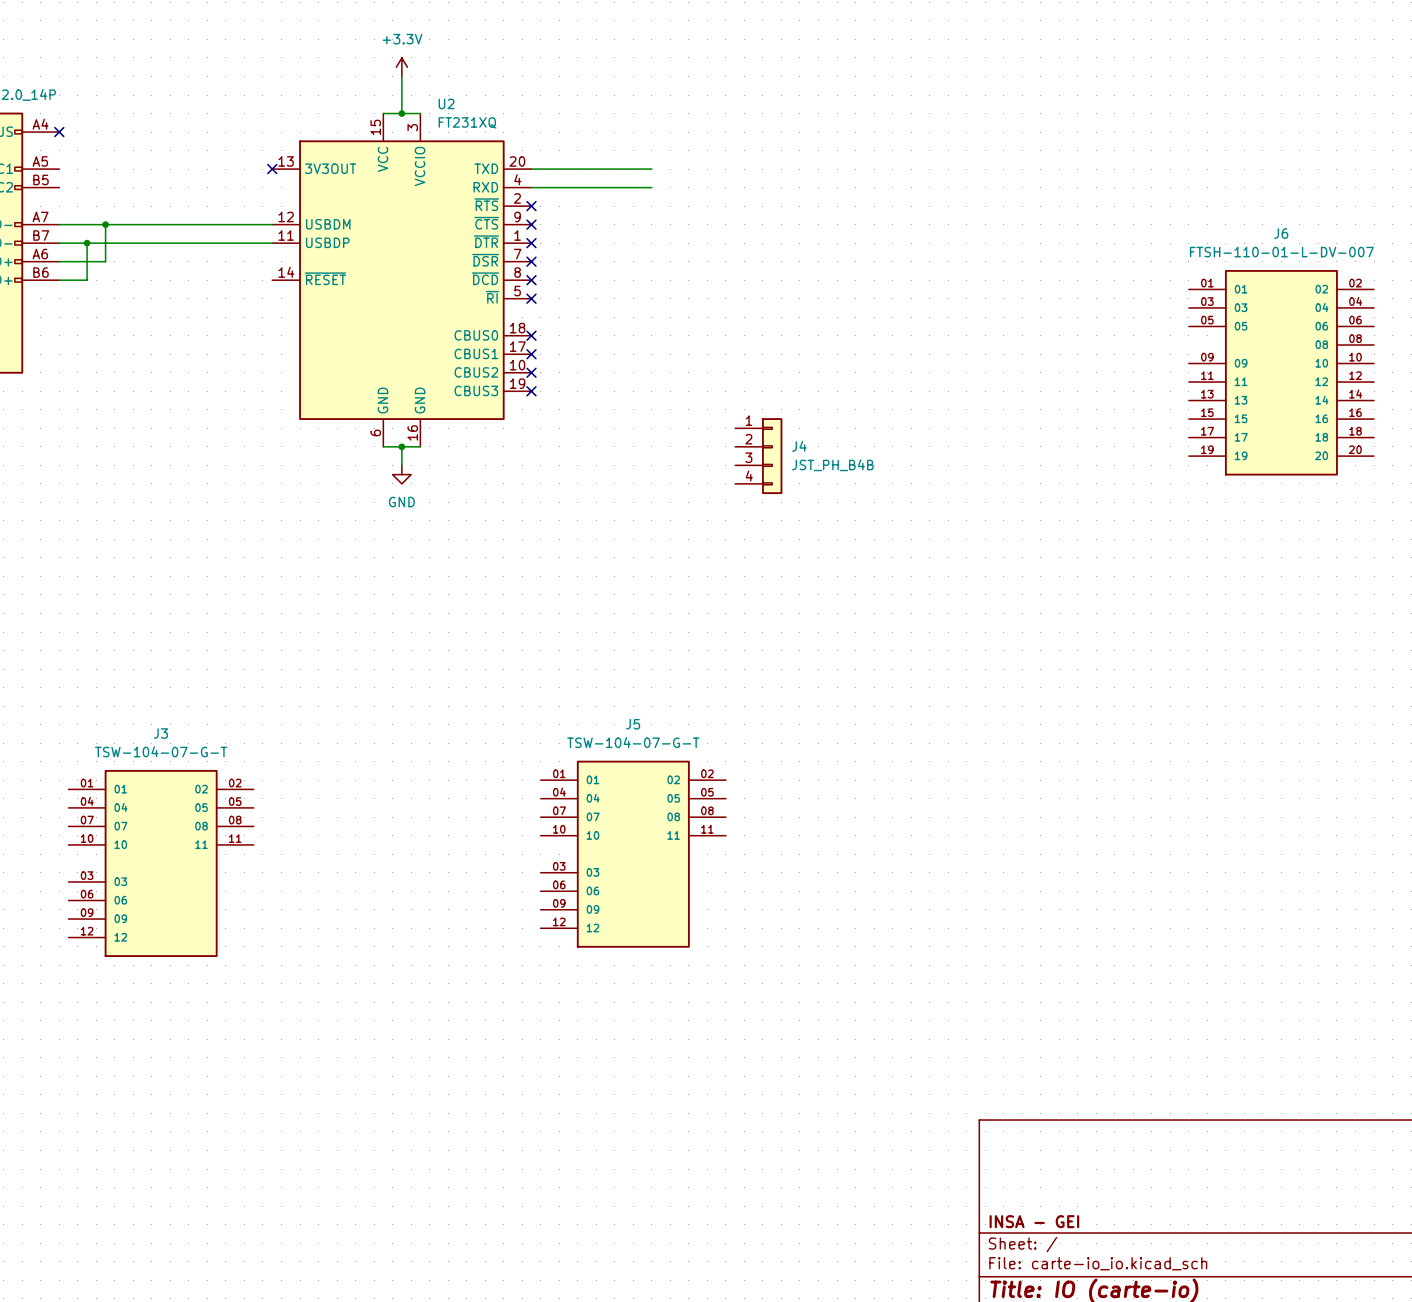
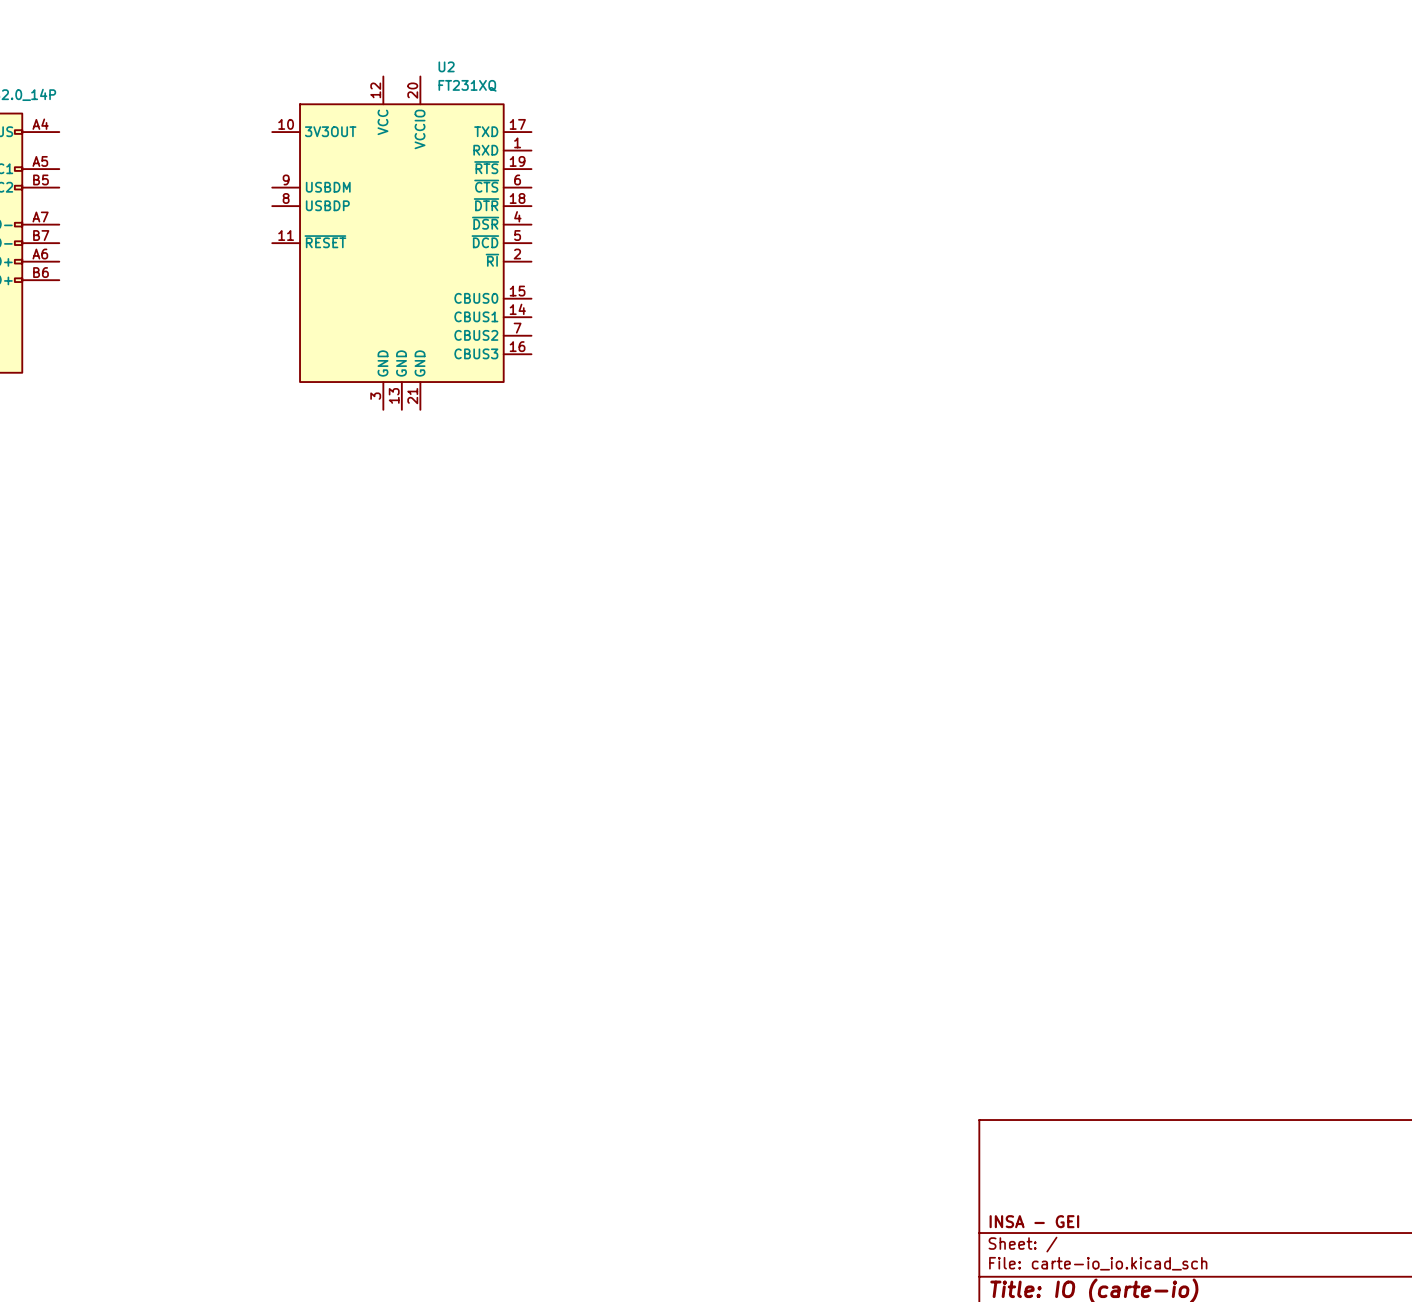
power symbol: +3.3V (401, 67) -> none
wire: (401, 76) (401, 113) -> none
U2 symbol: [272, 113, 532, 447] -> [272, 76, 532, 410]
junction: (401, 113) -> none
no-connect mark: (59, 132) -> none
no-connect mark: (272, 169) -> none
wire: (531, 169) (651, 169) -> none
wire: (531, 187) (651, 187) -> none
no-connect mark: (531, 206) -> none
wire: (59, 224) (272, 224) -> none
wire: (105, 224) (105, 261) (59, 261) -> none
junction: (105, 224) -> none
no-connect mark: (531, 224) -> none
wire: (59, 243) (272, 243) -> none
wire: (87, 243) (87, 280) (59, 280) -> none
junction: (87, 243) -> none
no-connect mark: (531, 243) -> none
no-connect mark: (531, 261) -> none
no-connect mark: (531, 280) -> none
no-connect mark: (531, 298) -> none
no-connect mark: (531, 335) -> none
no-connect mark: (531, 354) -> none
no-connect mark: (531, 372) -> none
J6: FTSH-110-01-L-DV-007 (1281, 372) -> none
no-connect mark: (531, 391) -> none
wire: (383, 446) (420, 446) -> none
wire: (401, 446) (401, 465) -> none
junction: (401, 446) -> none
J4: JST_PH_B4B (758, 456) -> none
power symbol: GND (401, 474) -> none
J5: TSW-104-07-G-T (633, 854) -> none
J3: TSW-104-07-G-T (161, 863) -> none

